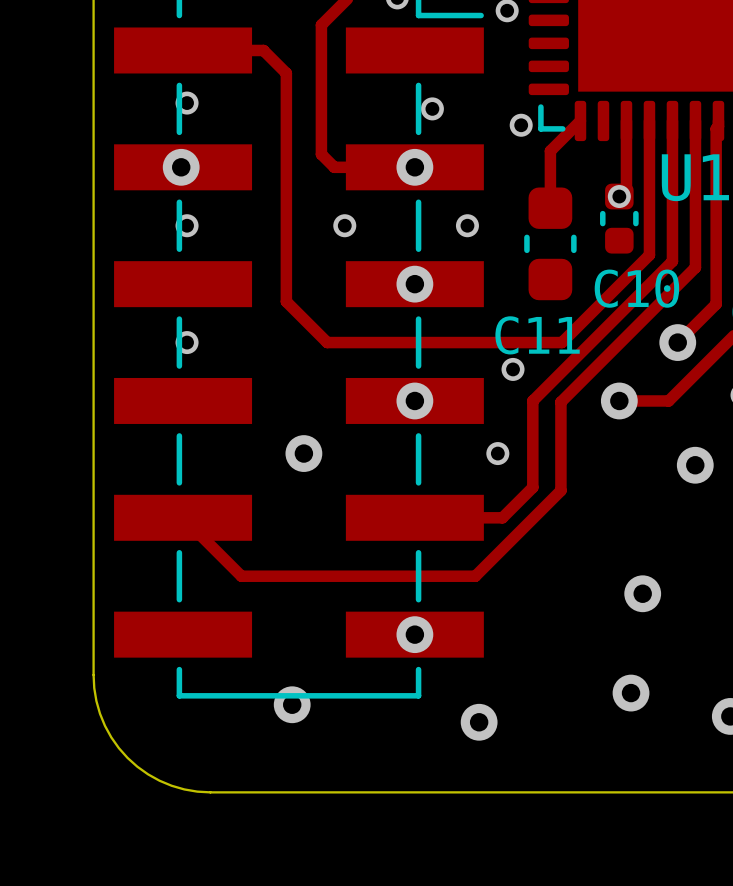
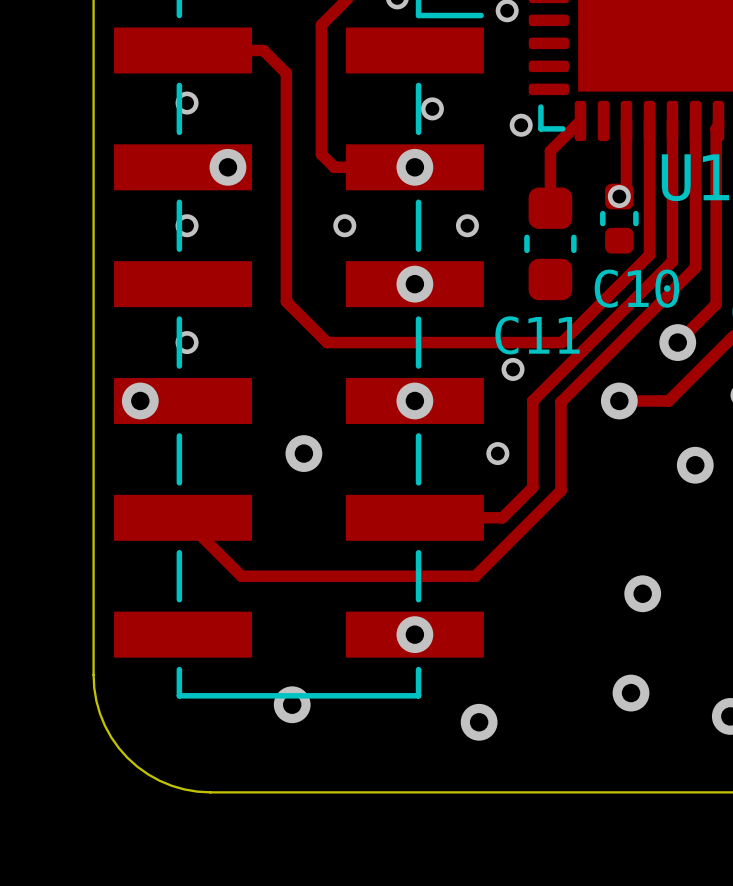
via position: (181, 167) -> (227, 167)
via: none -> (140, 400)

